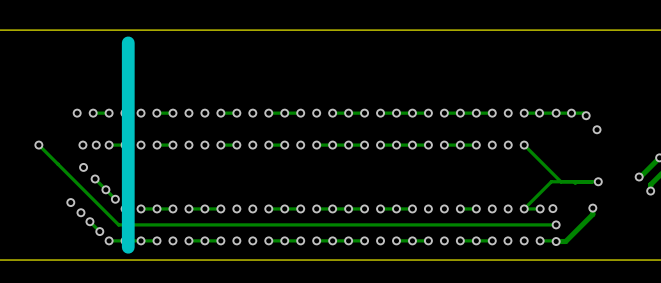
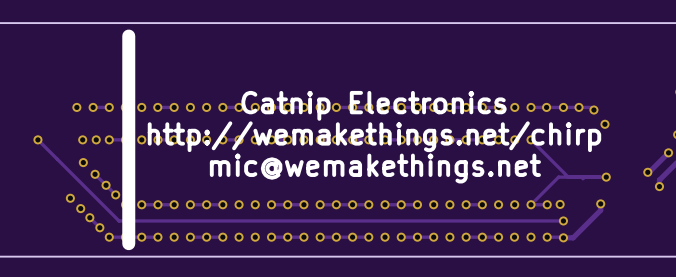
text: none -> Catnip Electronics (374, 105)
text: none -> http://wemakethings.net/chirp (374, 136)
text: none -> mic@wemakethings.net (375, 168)

